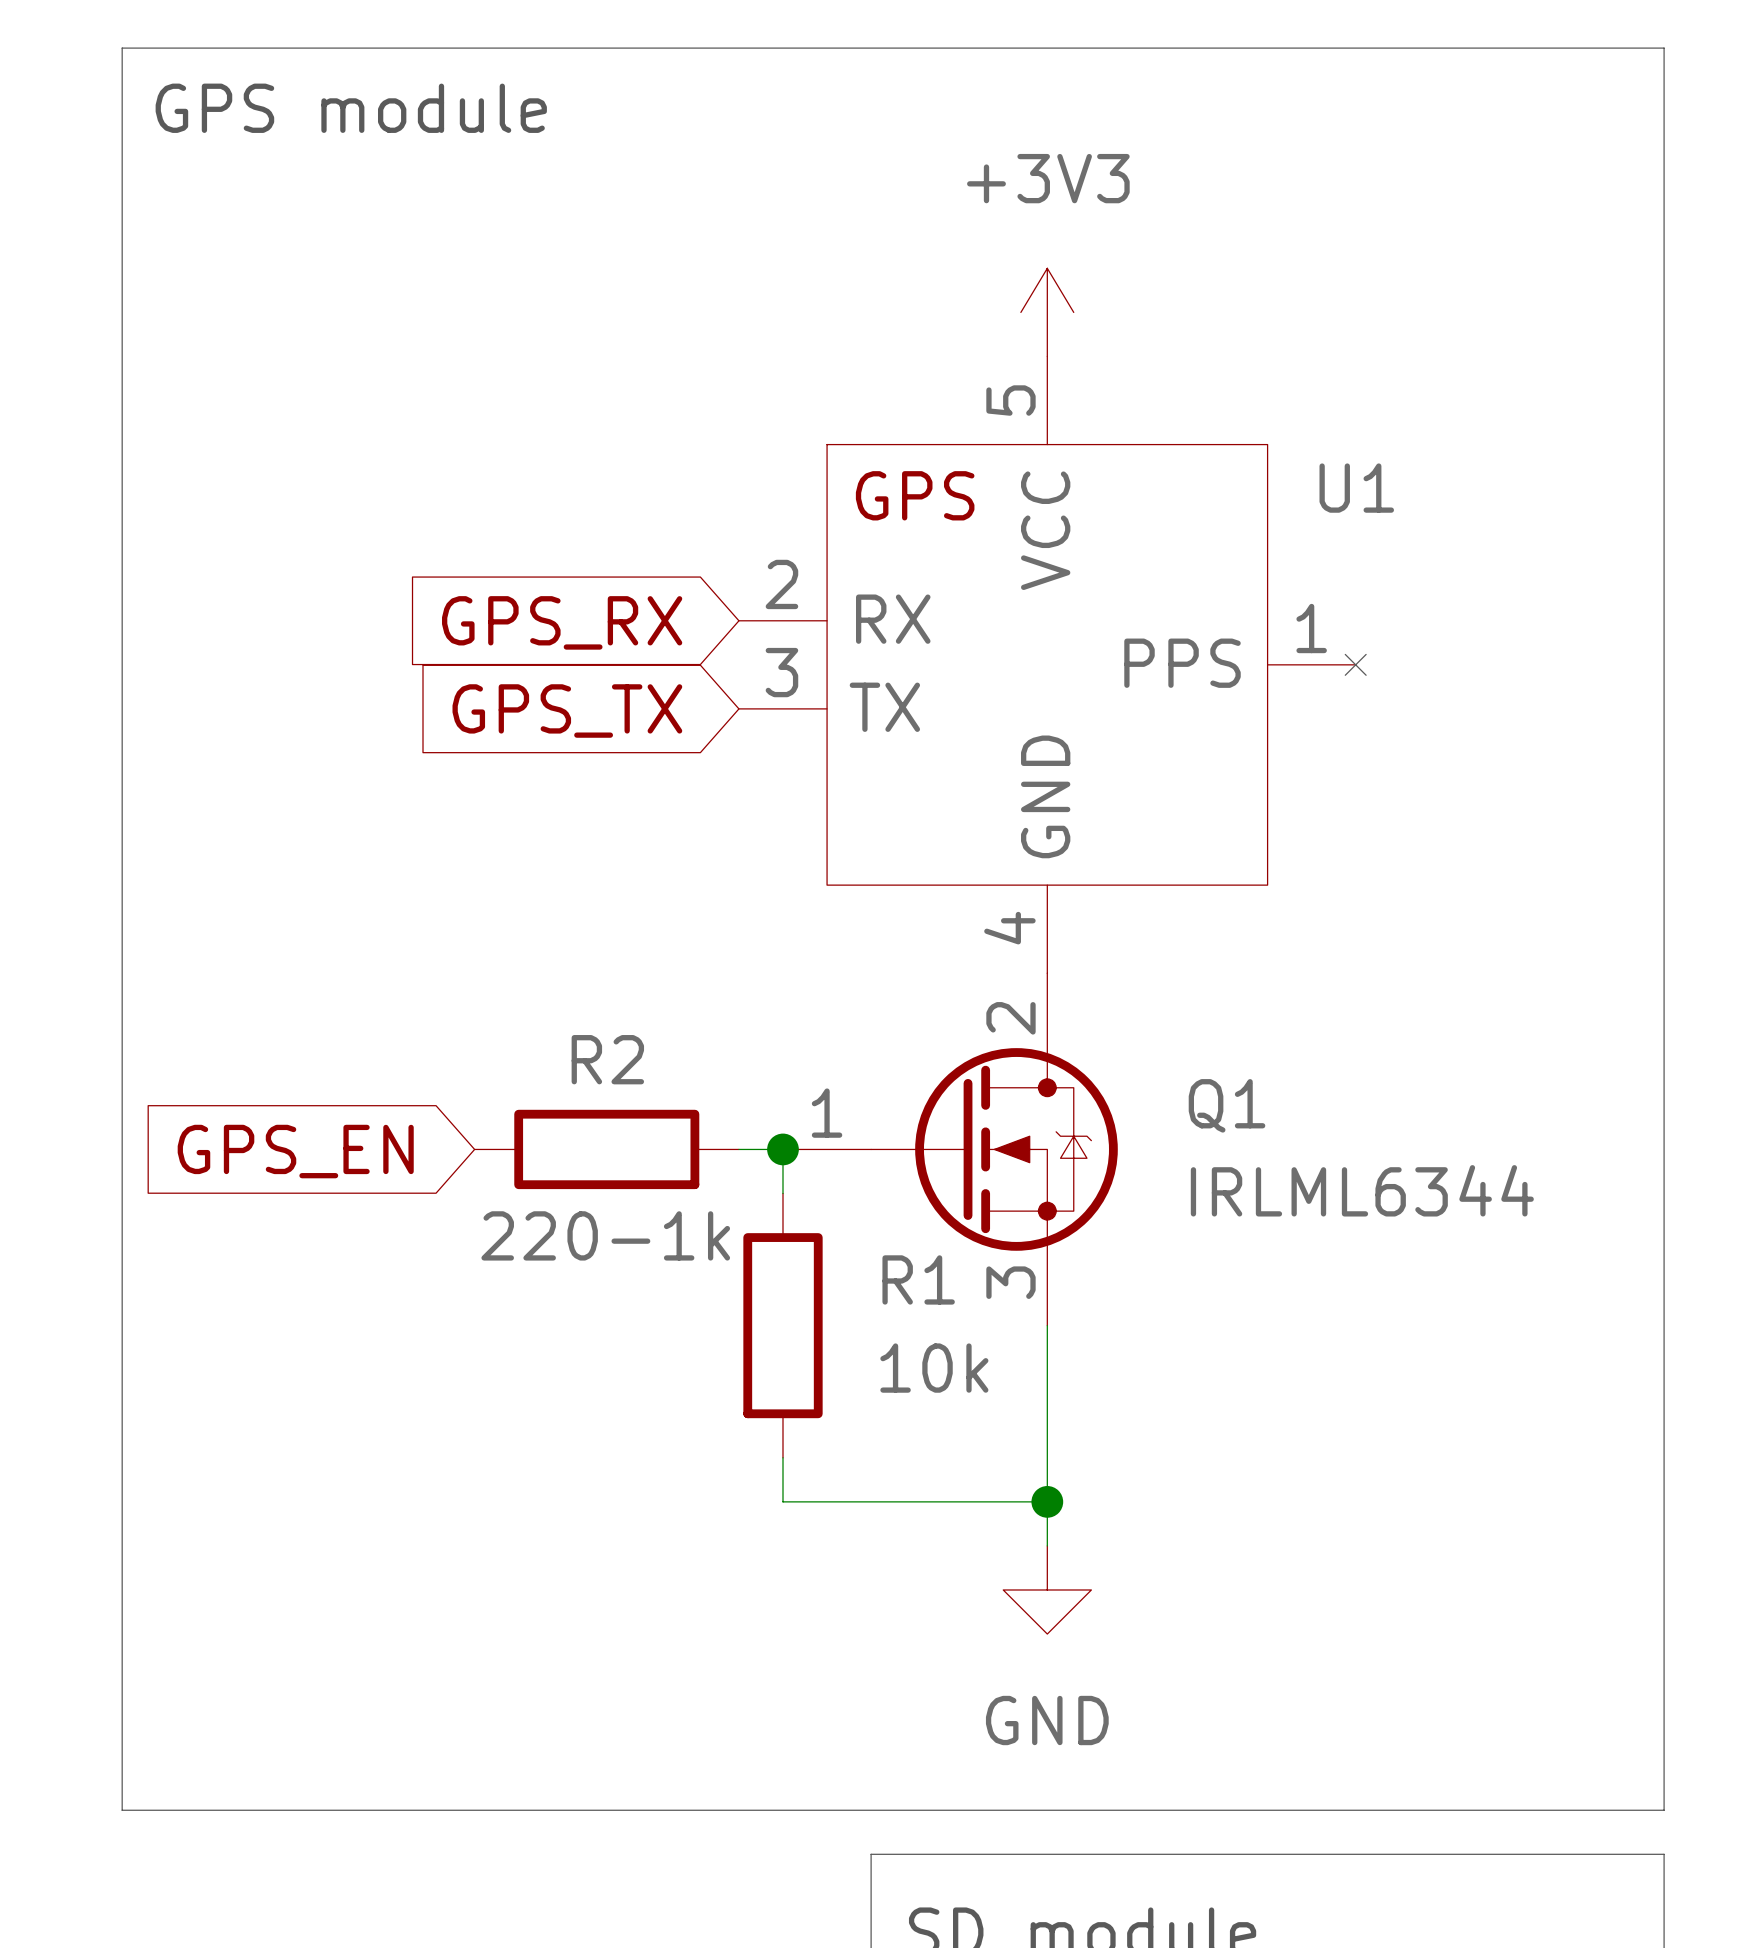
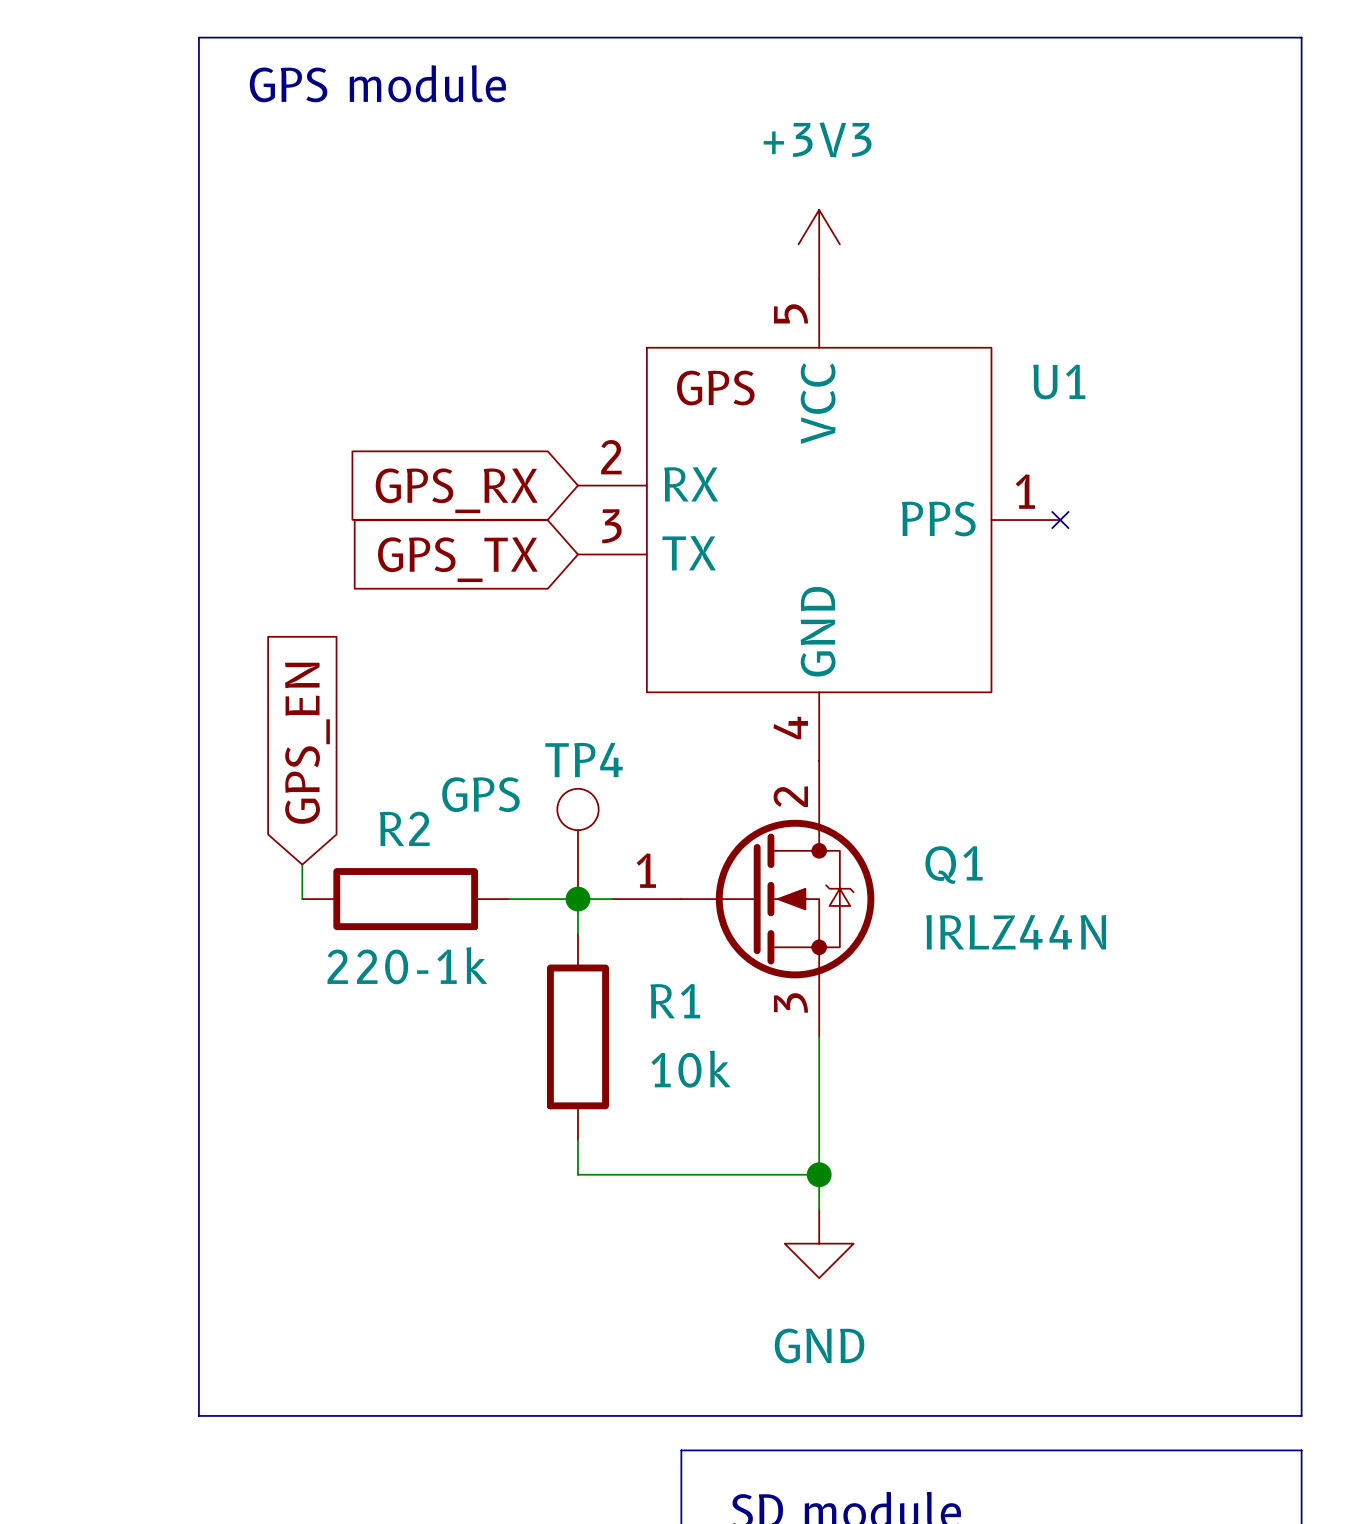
line: (254, 48) (122, 48) (122, 1810) (254, 1810) -> (198, 37) (198, 1415)
text position: GPS module (351, 108) -> GPS module (377, 83)
TP4: none -> GPS (577, 843)
R2 position: (606, 1149) -> (405, 899)
wire: none -> (509, 899) (577, 899) (577, 933)
wire: (782, 1149) (782, 1193) -> (302, 864) (302, 899)
junction position: (782, 1149) -> (577, 899)
global label rotation: 0° (295, 1151) -> 90° clockwise (307, 743)
Q1 value: IRLML6344 (1362, 1190) -> IRLZ44N (1016, 932)
R1 position: (782, 1325) -> (577, 1036)
wire: (782, 1457) (782, 1501) -> (577, 1140) (577, 1174) (612, 1174)

